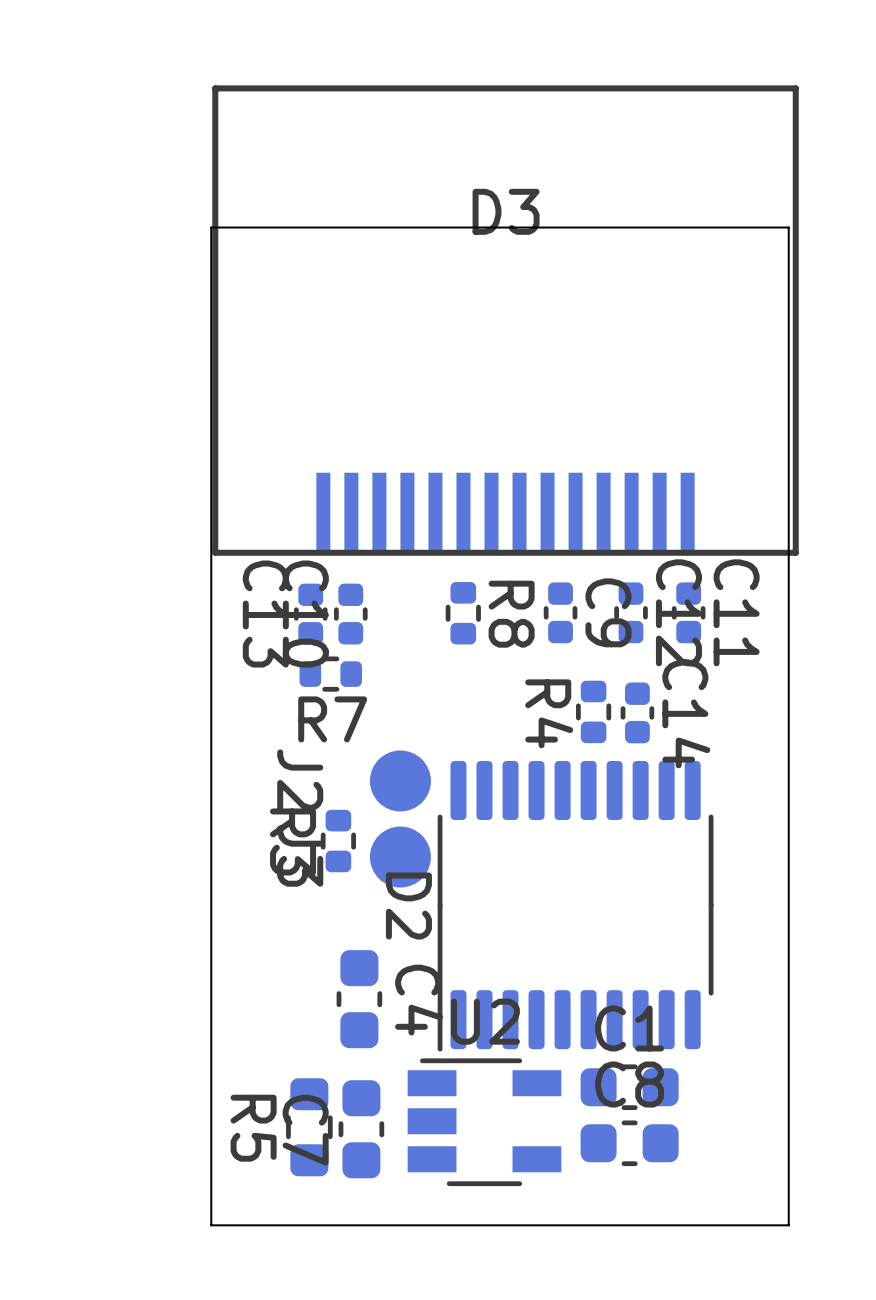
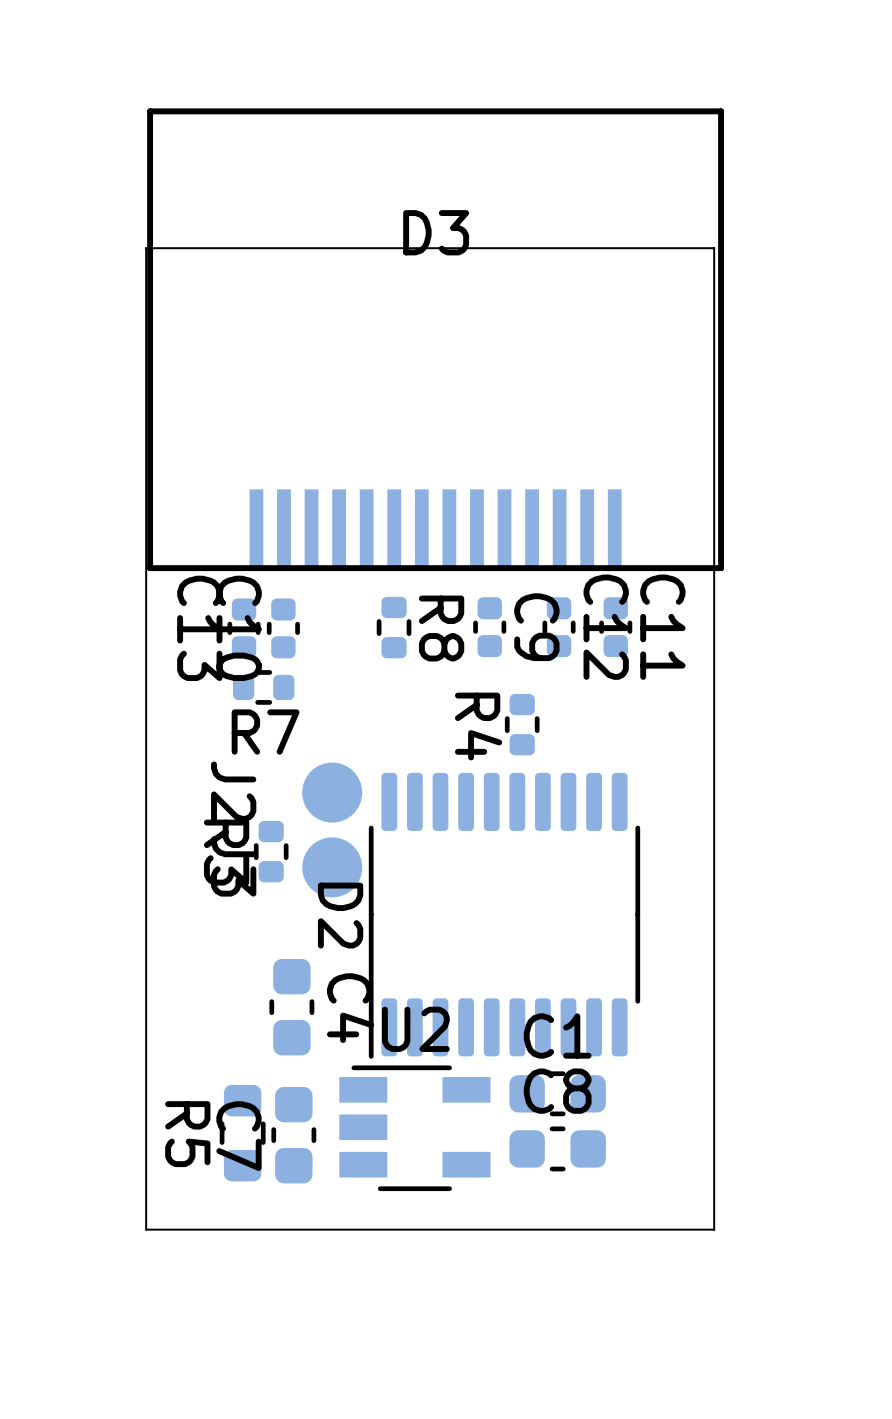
C14: (637, 712) -> none

